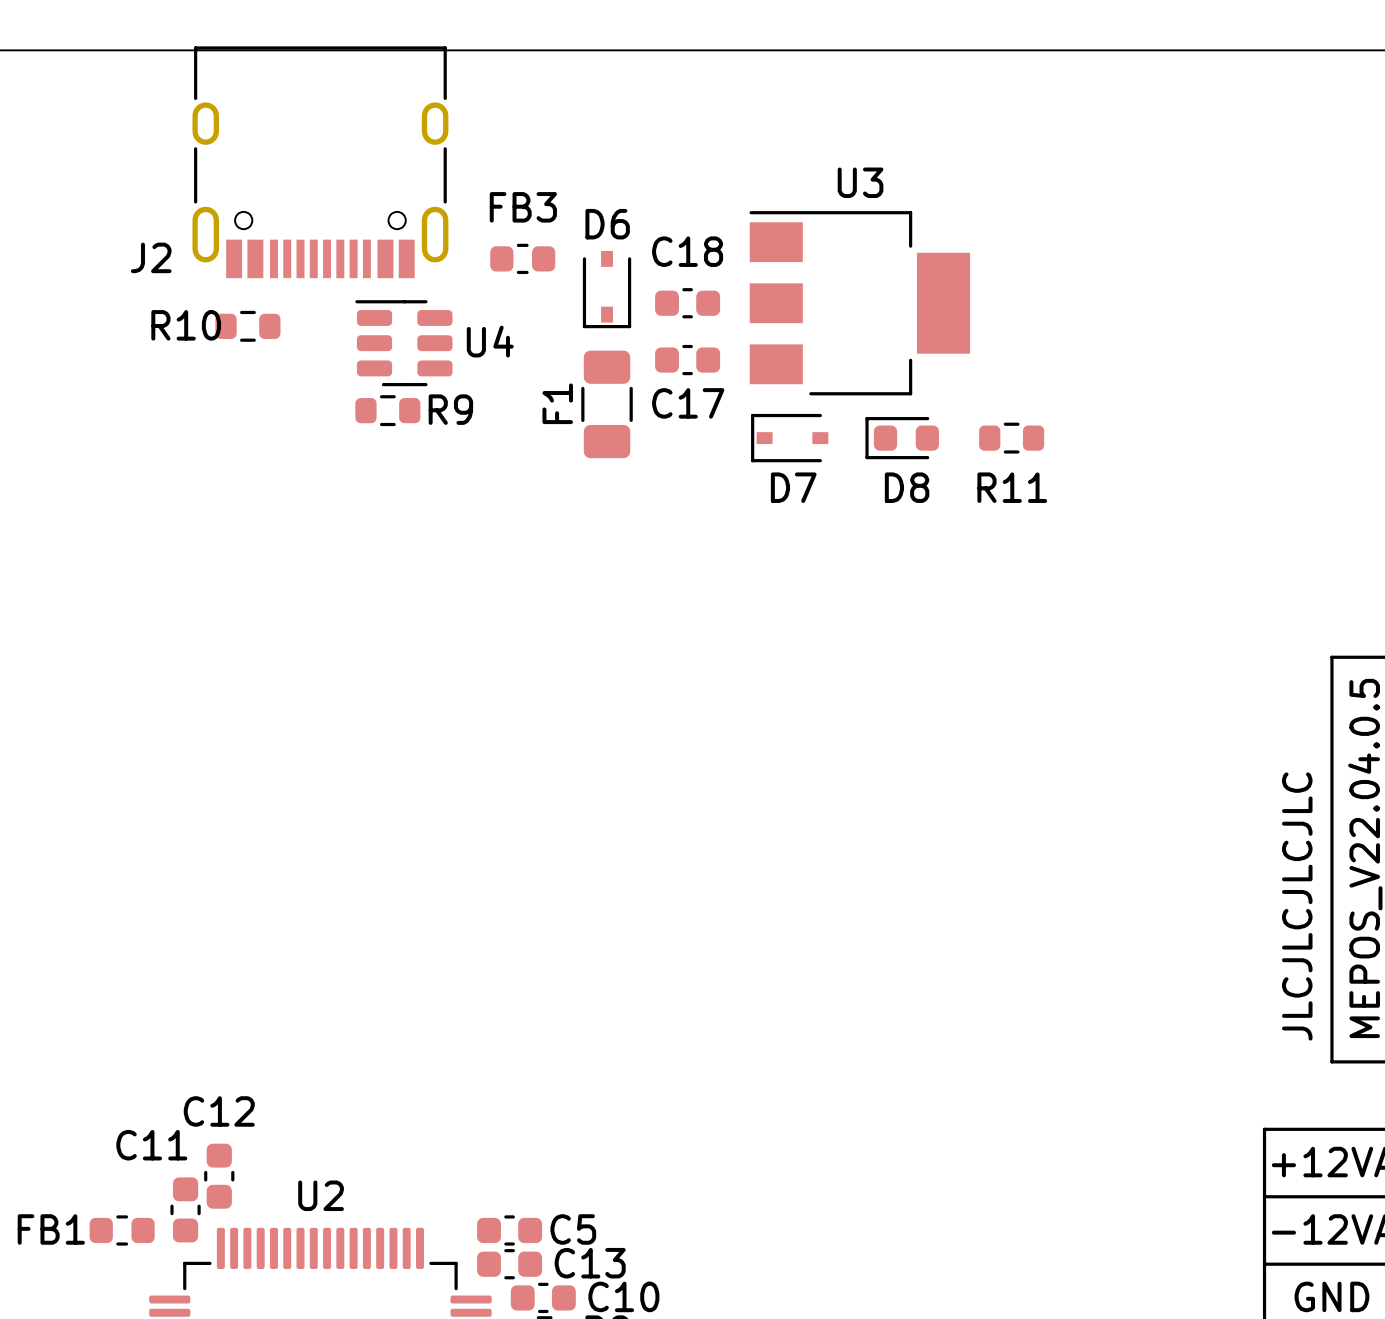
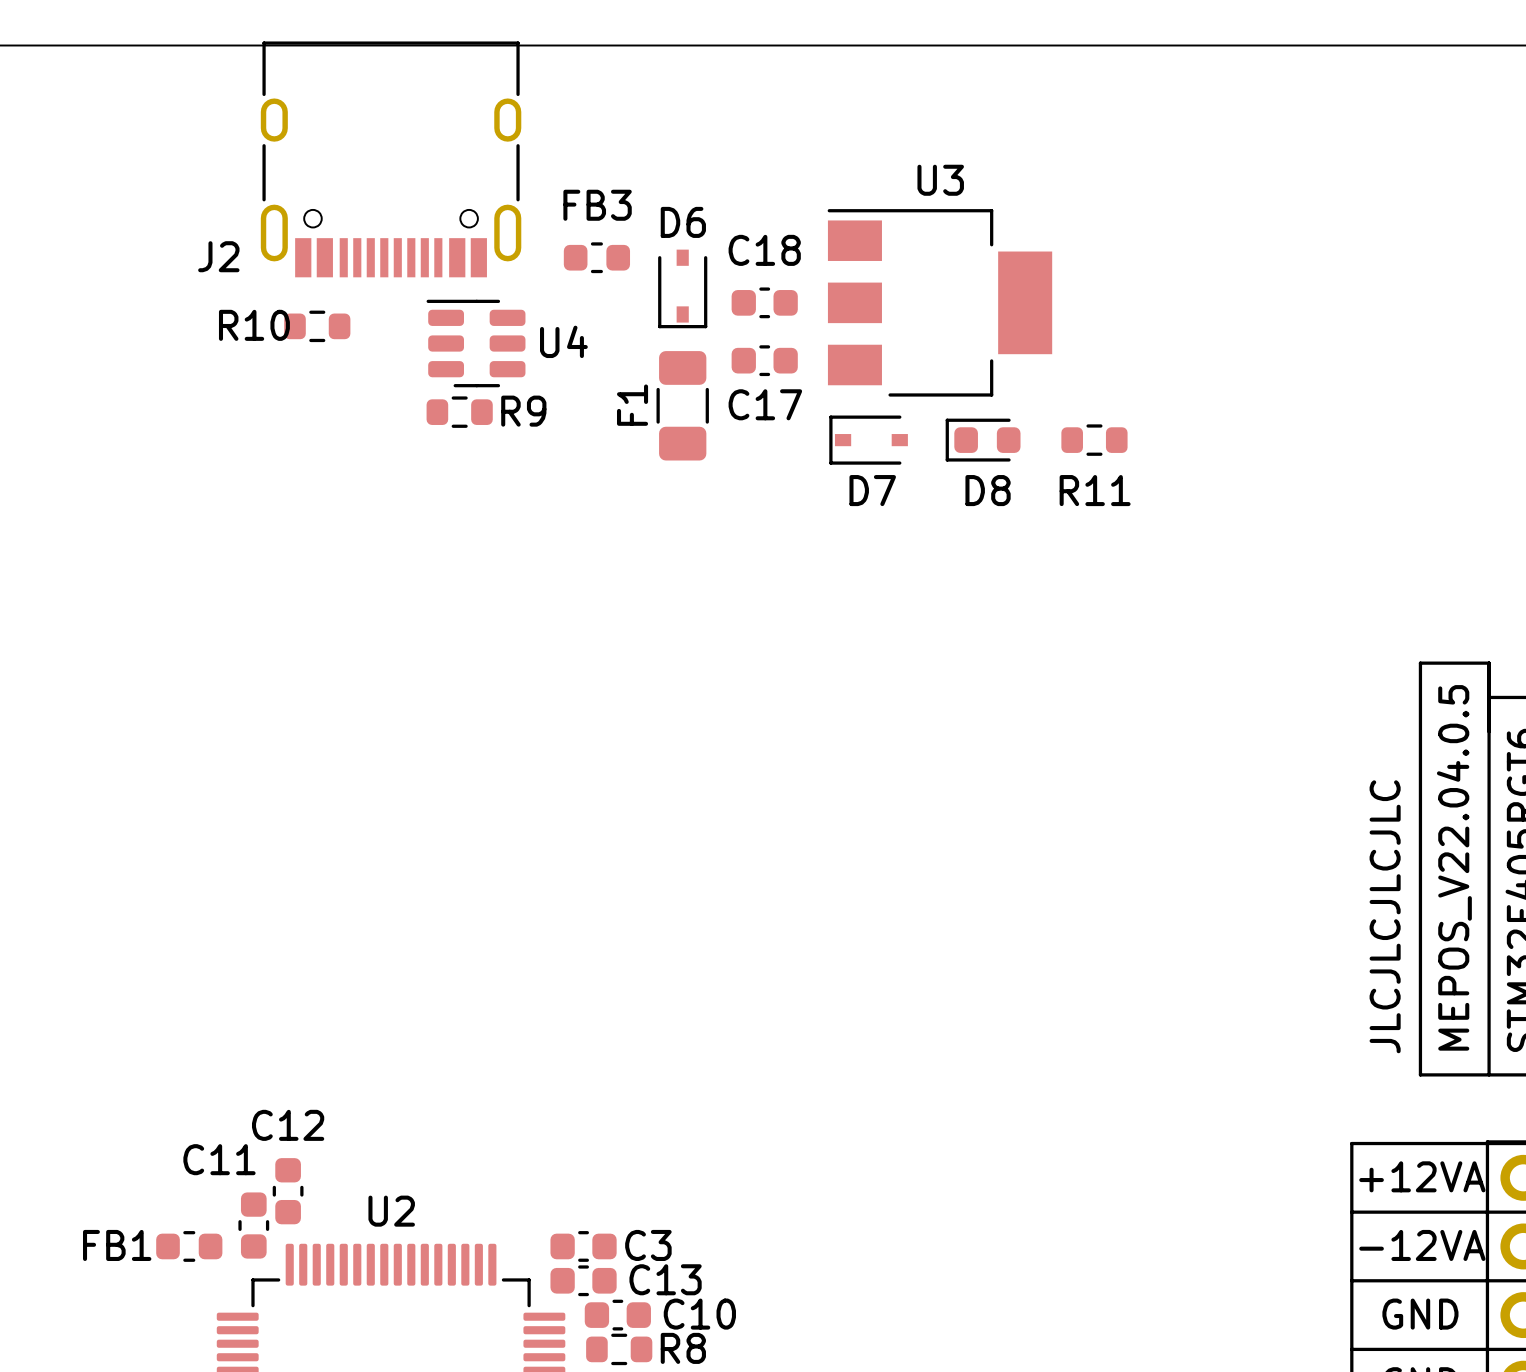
C5 name: C5 (573, 1229) -> C3 (648, 1245)

